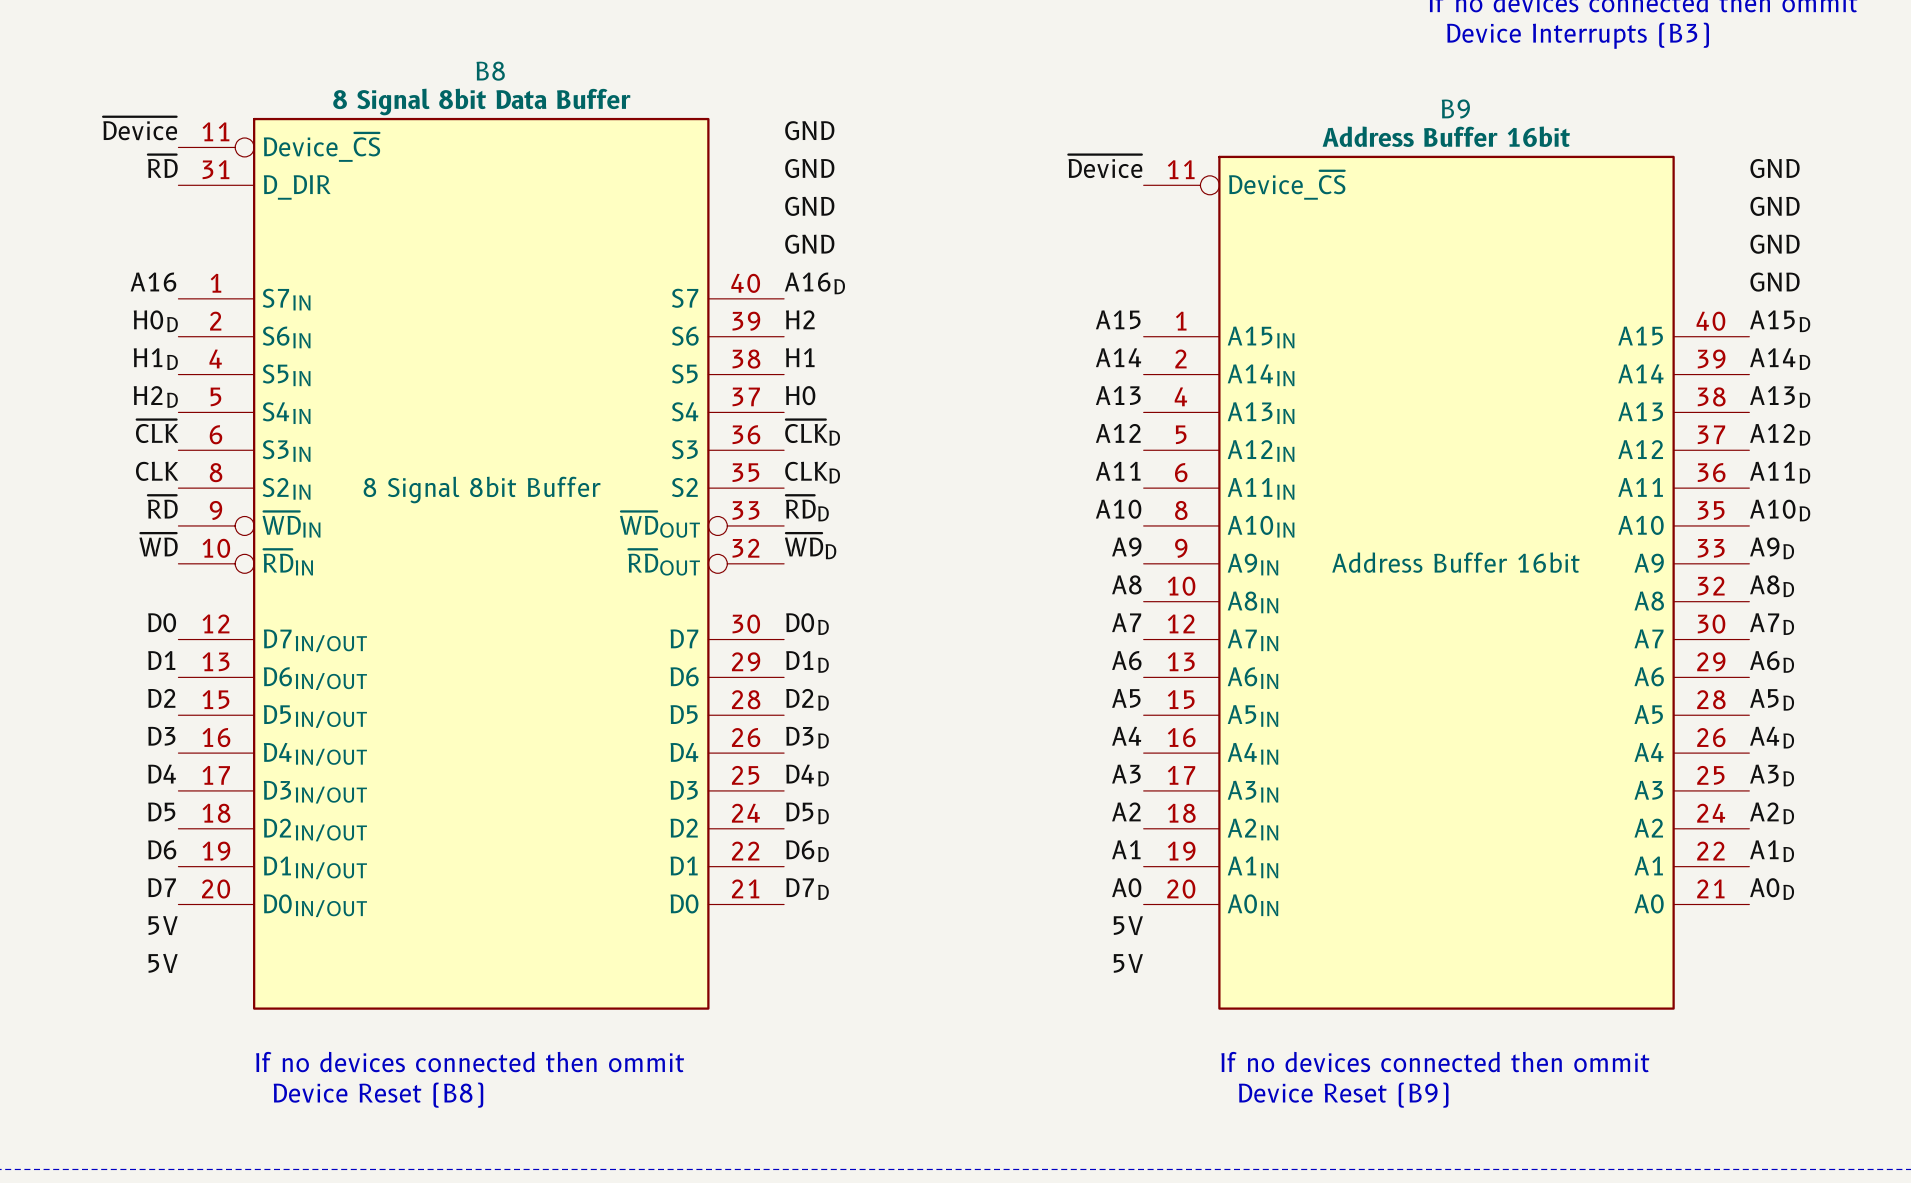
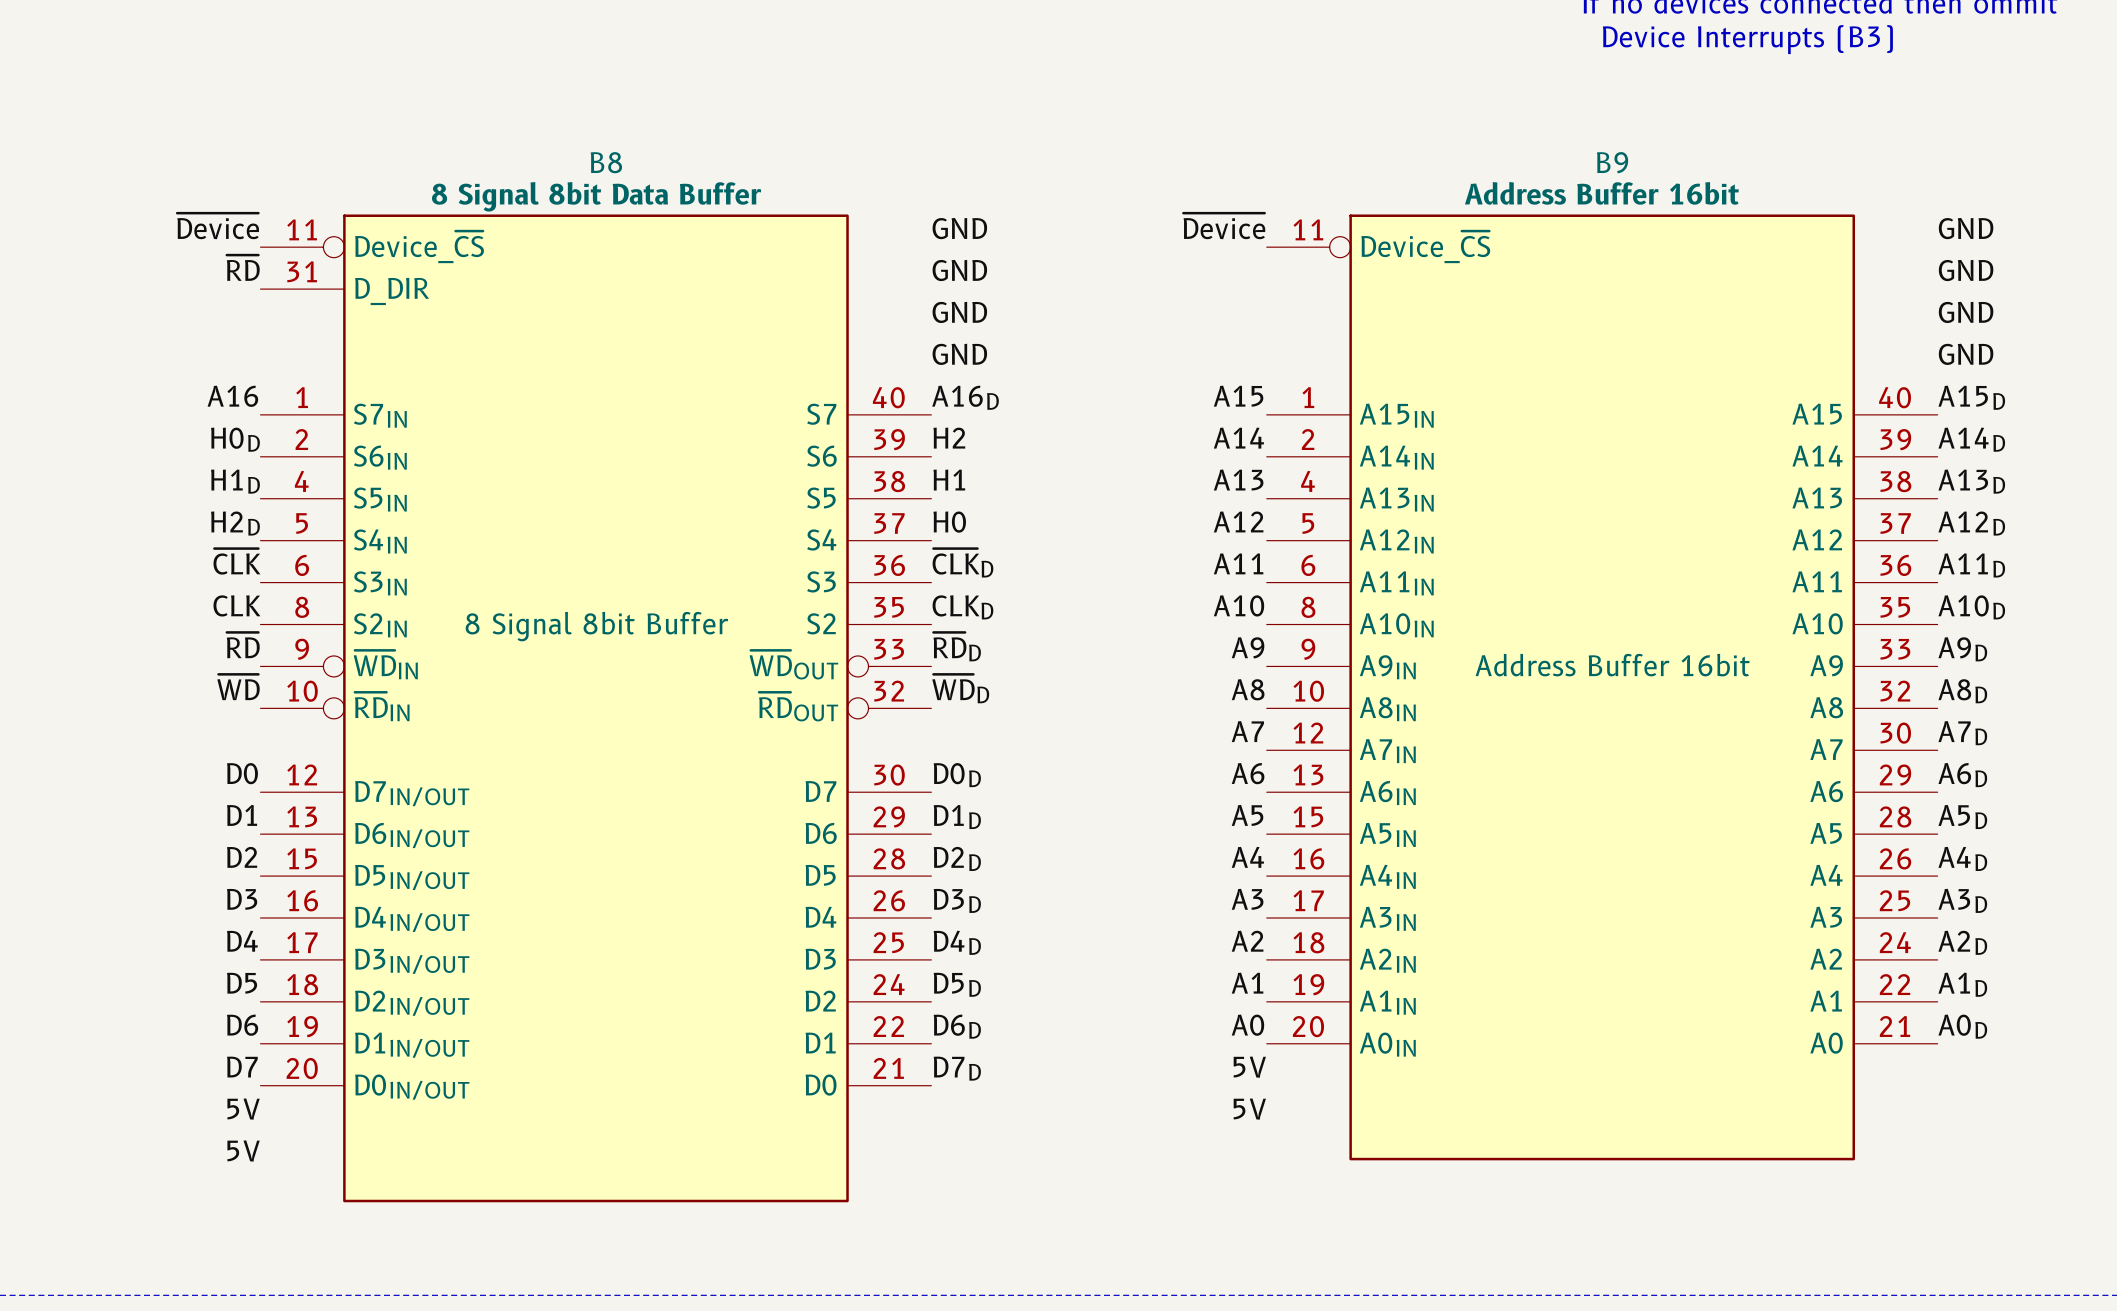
label position: ~{Device} (140, 128) -> ~{Device} (218, 226)
label: GND (809, 130) -> none
label position: ~{RD} (162, 166) -> ~{RD} (243, 267)
label position: ~{Device} (1105, 166) -> ~{Device} (1224, 226)
label: GND (809, 168) -> none
label: GND (1775, 168) -> none
label: GND (809, 206) -> none
label: none -> GND (959, 228)
label: GND (809, 244) -> none
label: none -> GND (959, 270)
label position: A16 (153, 282) -> A16 (232, 396)
label: none -> GND (959, 312)
label position: A16D (814, 283) -> A16D (965, 397)
label position: H2 (800, 319) -> H2 (949, 438)
label: none -> GND (959, 354)
label: A15 (1118, 319) -> none
label position: H0D (155, 321) -> H0D (235, 439)
label: A15D (1780, 321) -> GND (1966, 354)
label position: H1 (800, 357) -> H1 (949, 480)
label: A14 (1118, 357) -> A15 (1238, 396)
label position: H1D (155, 359) -> H1D (235, 481)
label: A14D (1780, 359) -> A15D (1971, 397)
label position: H0 (800, 395) -> H0 (949, 522)
label: A13 (1118, 395) -> A14 (1238, 438)
label position: H2D (155, 396) -> H2D (235, 523)
label: A13D (1780, 396) -> A14D (1971, 439)
label position: ~{CLK} (157, 431) -> ~{CLK} (236, 561)
label position: ~{CLK}D (812, 432) -> ~{CLK}D (962, 563)
label: A12 (1118, 433) -> A13 (1238, 480)
label: A12D (1780, 434) -> A13D (1971, 481)
label position: CLK (157, 471) -> CLK (236, 605)
label: A11 (1118, 471) -> A12 (1238, 521)
label position: CLKD (812, 472) -> CLKD (962, 607)
label: A11D (1780, 472) -> A12D (1971, 523)
label position: ~{RD} (162, 506) -> ~{RD} (243, 645)
label position: ~{RD}D (807, 508) -> ~{RD}D (957, 646)
label: A10 (1118, 509) -> A11 (1238, 563)
label: A10D (1780, 510) -> A11D (1971, 565)
label position: ~{WD} (158, 544) -> ~{WD} (238, 687)
label position: ~{WD}D (810, 546) -> ~{WD}D (960, 688)
label: A9 (1126, 547) -> A10 (1239, 605)
label: A9D (1772, 548) -> A10D (1971, 607)
B8 position: (481, 563) -> (595, 708)
B9 position: (1446, 582) -> (1602, 687)
label: A8 (1126, 584) -> A9 (1248, 647)
label: A8D (1772, 586) -> A9D (1962, 649)
label position: D0 (162, 622) -> D0 (242, 773)
label: A7 (1126, 622) -> A8 (1248, 689)
label position: D0D (807, 624) -> D0D (957, 775)
label: A7D (1772, 624) -> A8D (1962, 691)
label position: D1 (161, 660) -> D1 (242, 815)
label: A6 (1126, 660) -> A7 (1247, 731)
label position: D1D (807, 661) -> D1D (957, 817)
label: A6D (1772, 661) -> A7D (1962, 733)
label position: D2 (161, 698) -> D2 (242, 857)
label: A5 (1126, 698) -> A6 (1248, 773)
label position: D2D (807, 699) -> D2D (957, 858)
label: A5D (1772, 699) -> A6D (1962, 775)
label position: D3 (161, 736) -> D3 (242, 899)
label: A4 (1126, 736) -> A5 (1247, 815)
label position: D3D (807, 737) -> D3D (957, 900)
label: A4D (1772, 737) -> A5D (1962, 817)
label position: D4 (162, 774) -> D4 (242, 941)
label: A3 (1126, 774) -> A4 (1247, 857)
label position: D4D (807, 775) -> D4D (957, 942)
label: A3D (1772, 775) -> A4D (1962, 858)
label position: D5 (161, 811) -> D5 (242, 983)
label: A2 (1126, 811) -> A3 (1247, 899)
label position: D5D (807, 813) -> D5D (957, 984)
label: A2D (1772, 813) -> A3D (1962, 900)
label position: D6 (162, 849) -> D6 (242, 1025)
label: A1 (1126, 849) -> A2 (1247, 941)
label position: D6D (807, 851) -> D6D (957, 1026)
label: A1D (1772, 851) -> A2D (1962, 942)
label position: D7 (162, 887) -> D7 (242, 1067)
label: A0 (1126, 887) -> A1 (1247, 983)
label position: D7D (807, 889) -> D7D (957, 1068)
label: A0D (1772, 889) -> A1D (1962, 984)
label: 5V (163, 925) -> none
label: 5V (1128, 925) -> A0 (1247, 1025)
label: none -> A0D (1962, 1026)
label: 5V (163, 963) -> none
label: none -> 5V (243, 1109)
label: none -> 5V (1249, 1109)
label: none -> 5V (243, 1150)
text: If no devices connected then ommit (470, 1062) -> none
text: If no devices connected then ommit (1435, 1062) -> none
text: Device Reset (B8) (378, 1095) -> none
text: Device Reset (B9) (1343, 1095) -> none

